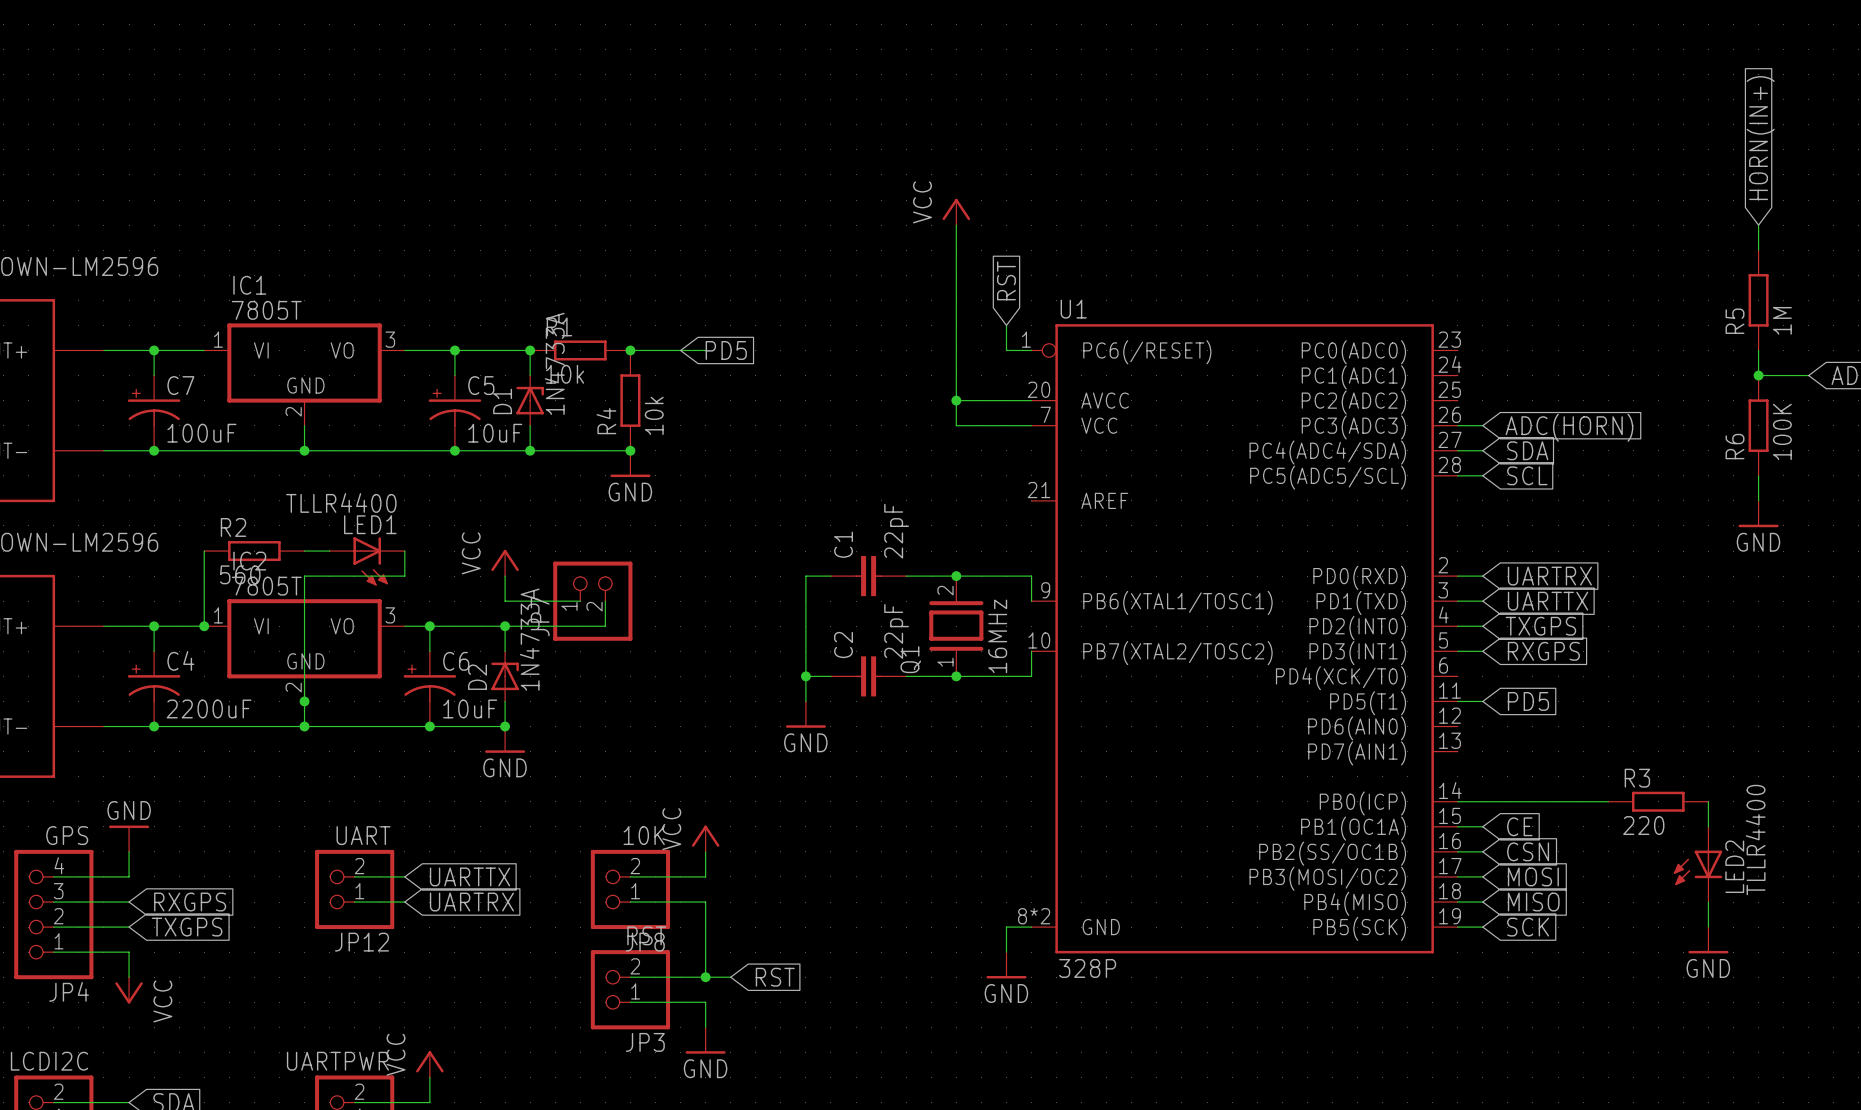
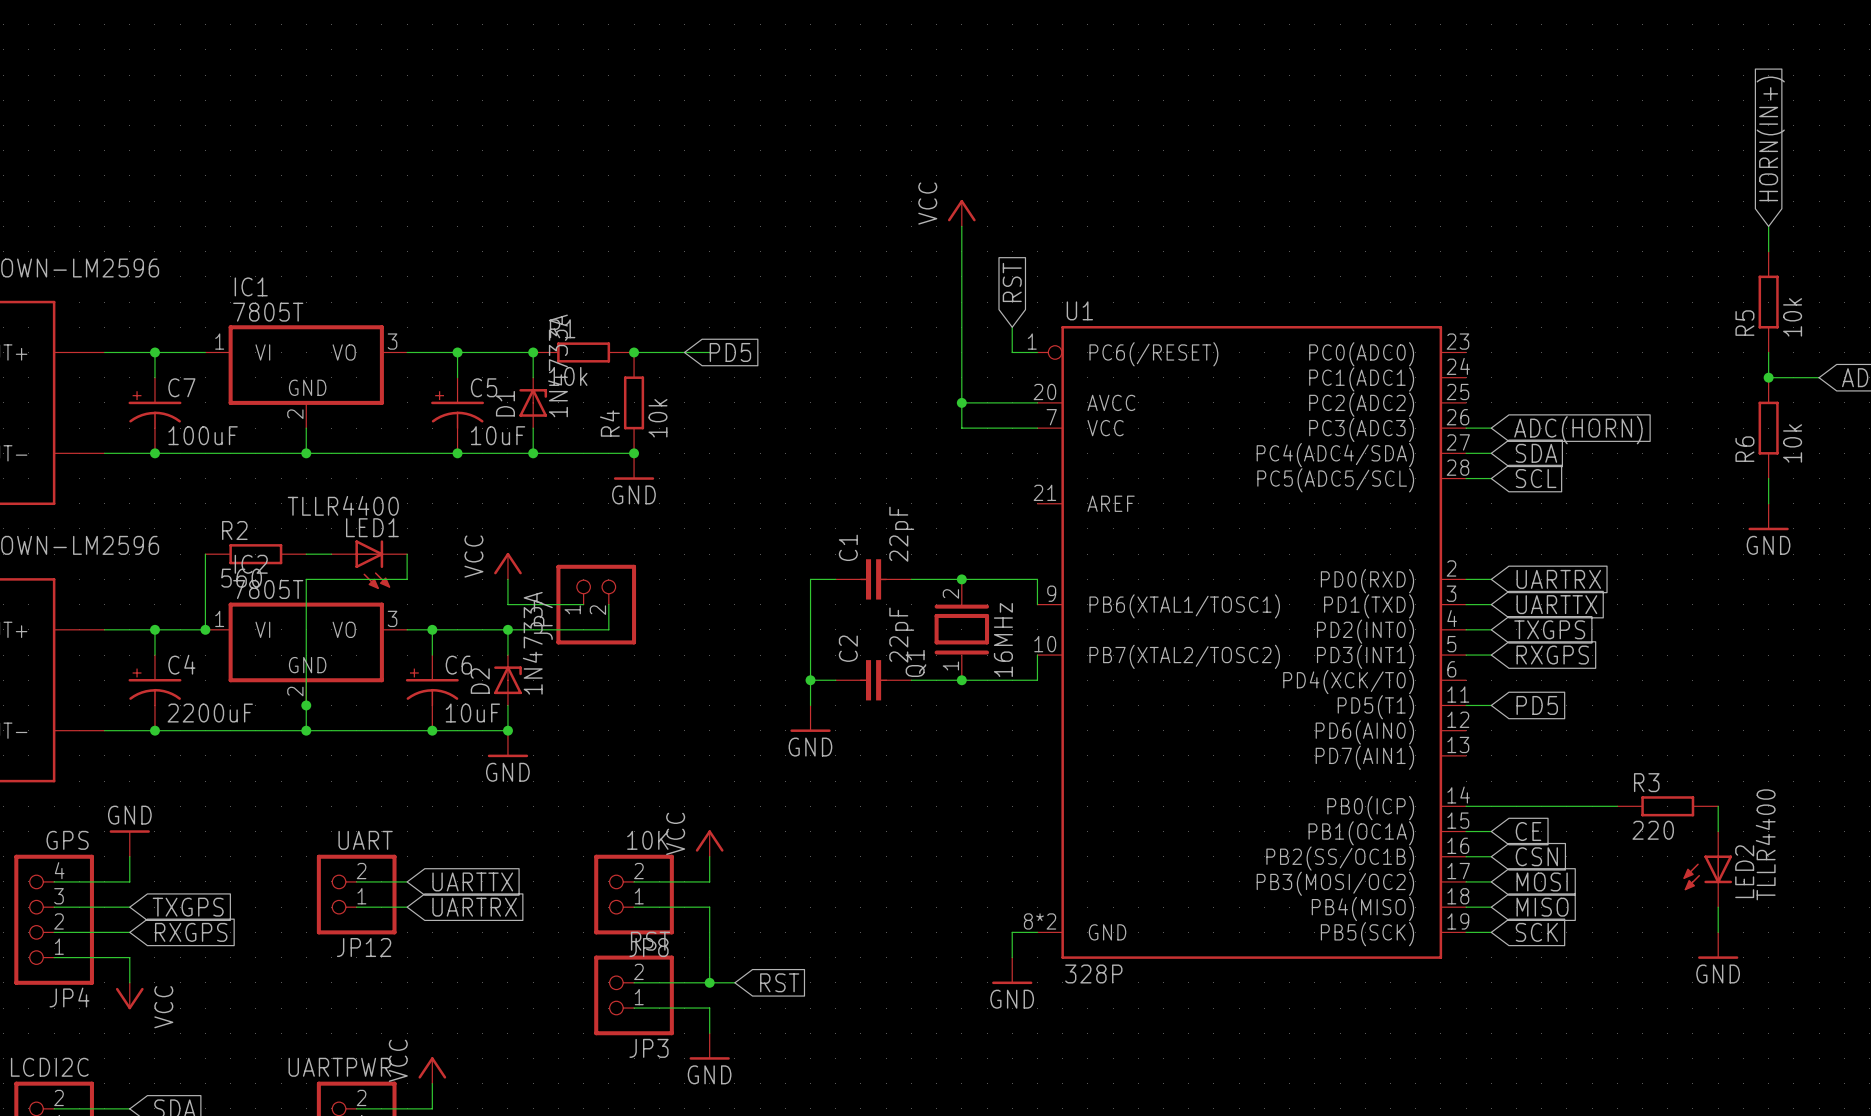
R5 value: 1M (1782, 320) -> 10k (1792, 317)
R6 value: 100K (1782, 431) -> 10k (1792, 443)
global label: RXGPS (190, 902) -> TXGPS (188, 907)
global label: TXGPS (187, 927) -> RXGPS (191, 932)

